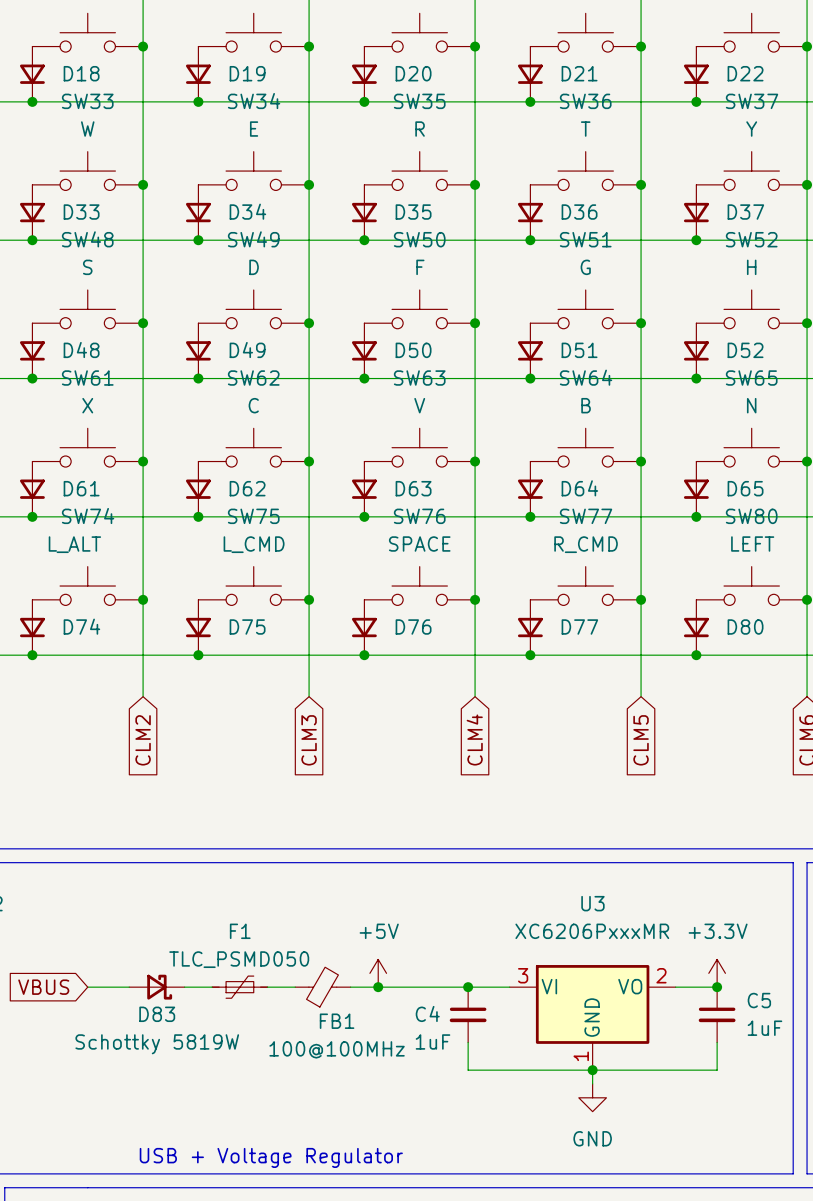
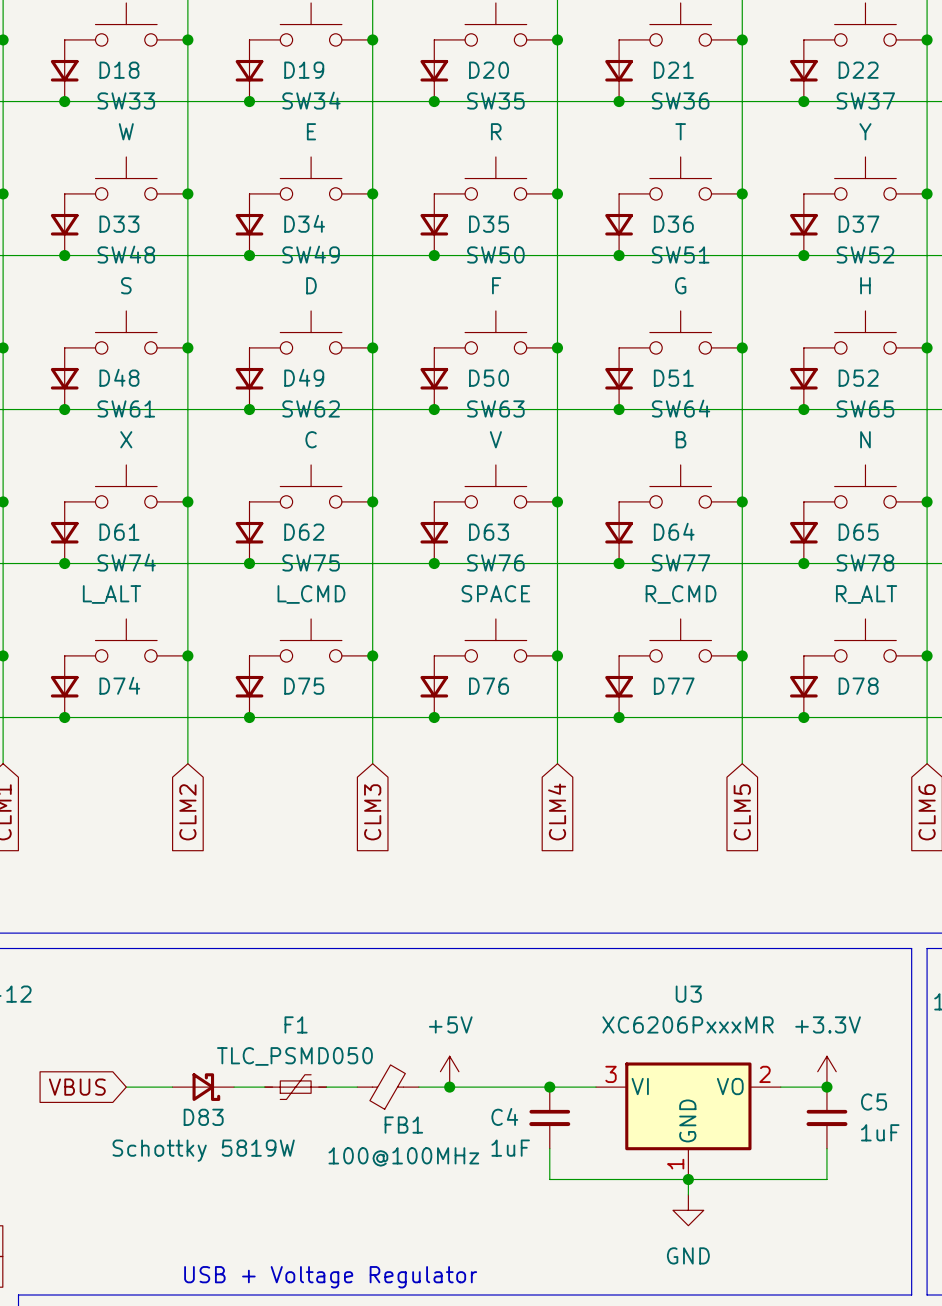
SW80 name: SW80 (751, 516) -> SW78 (865, 562)
SW80 value: LEFT (752, 544) -> R_ALT (866, 594)
D80 name: D80 (745, 627) -> D78 (858, 686)

